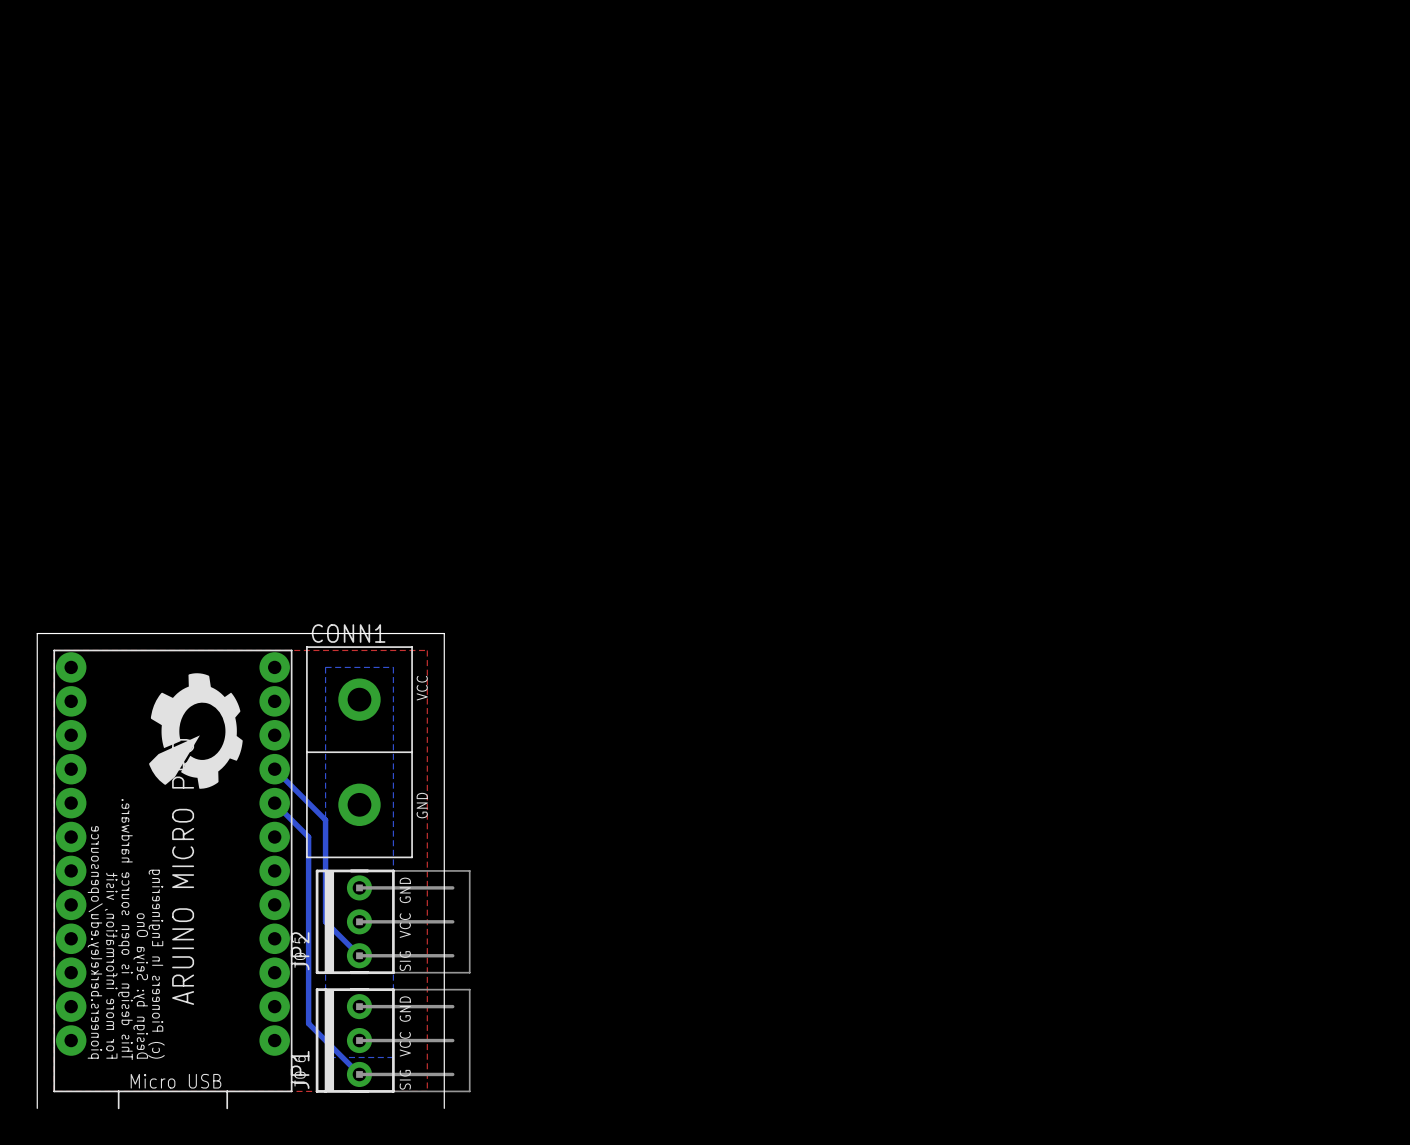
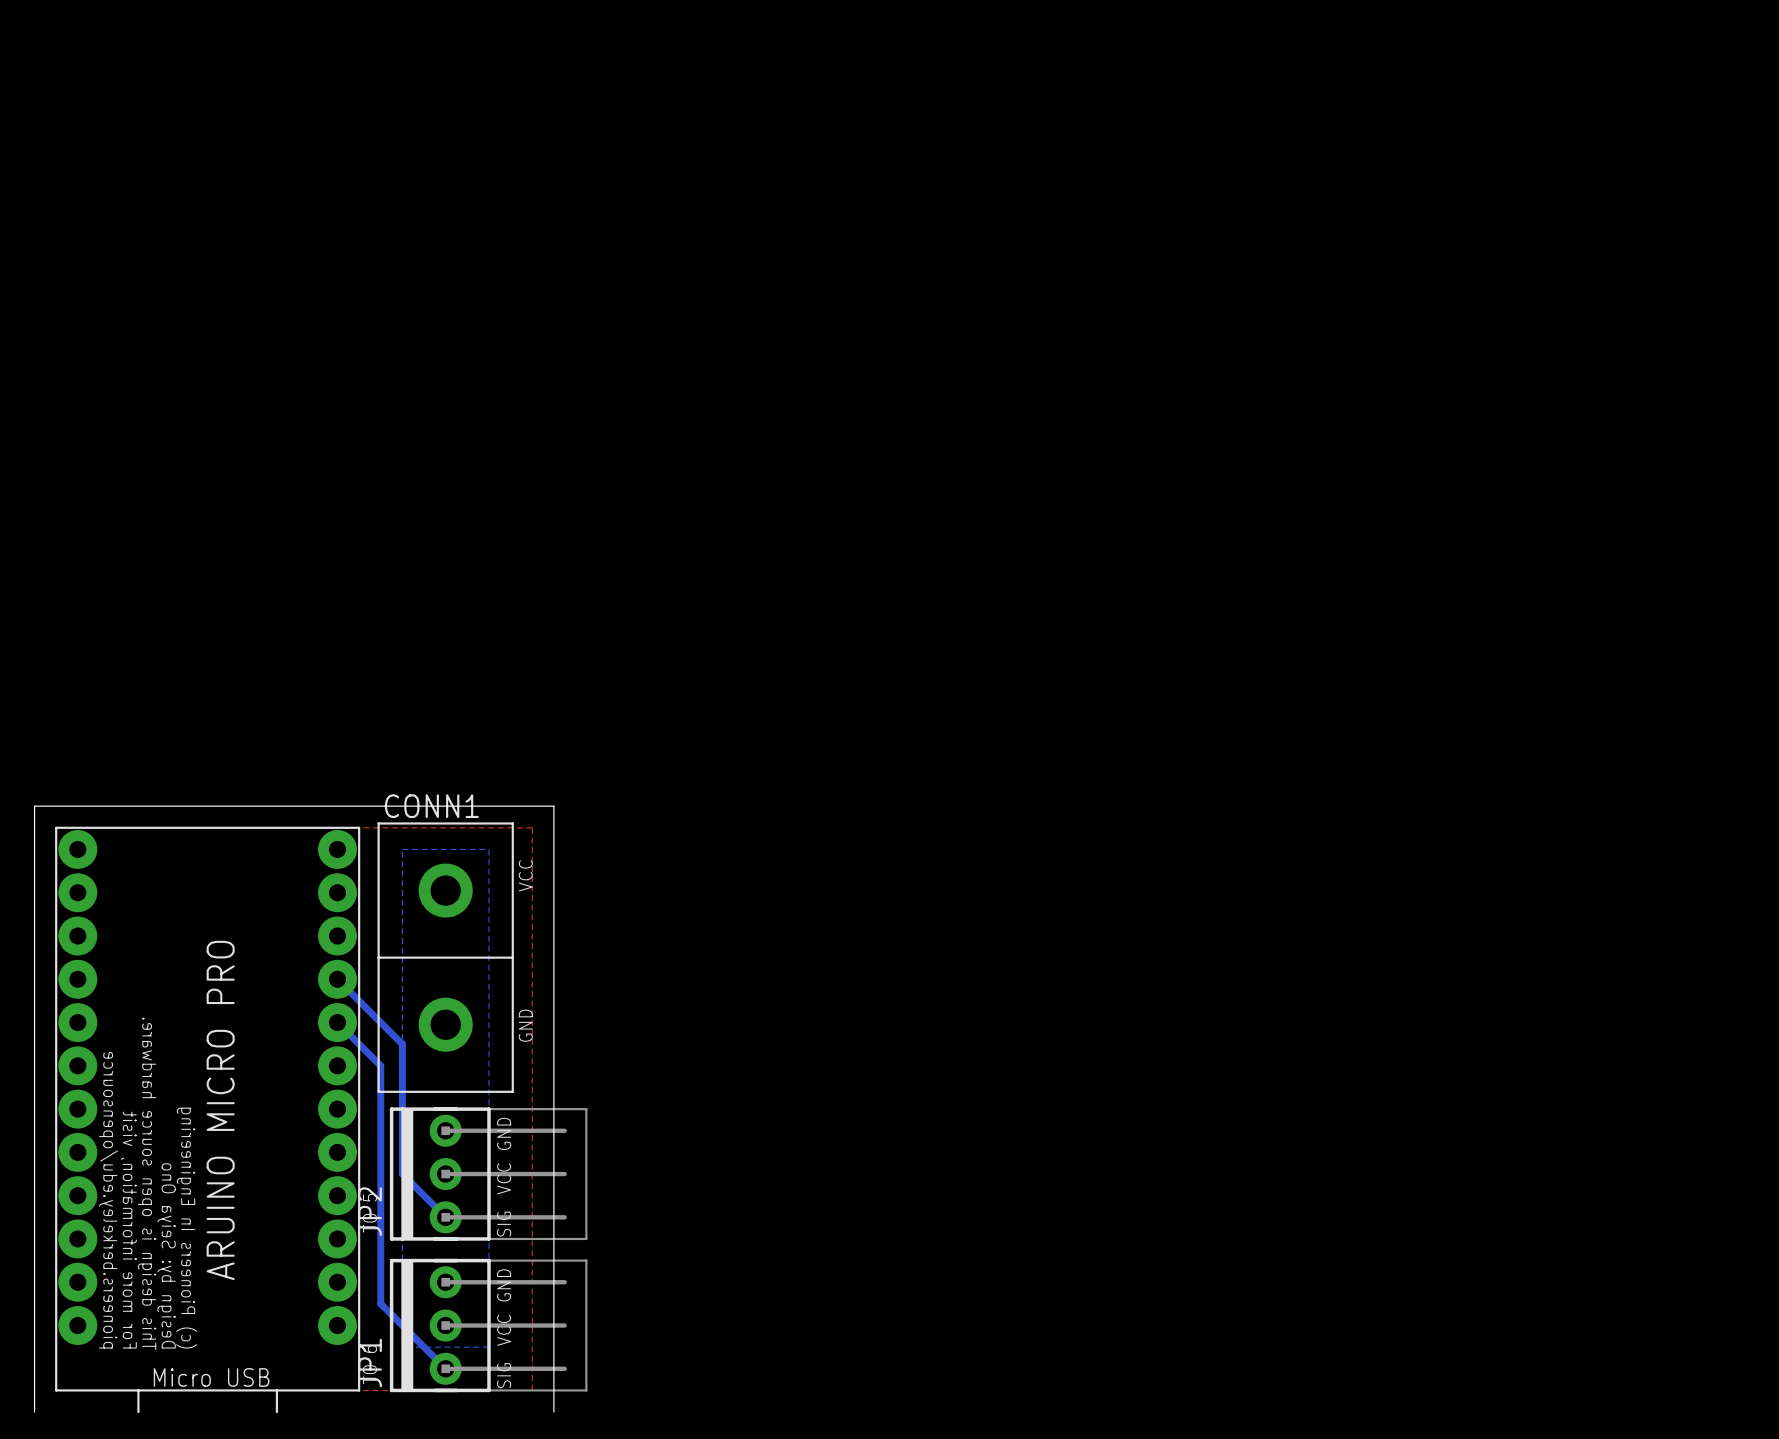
drawing: [149, 673, 243, 789] -> none

